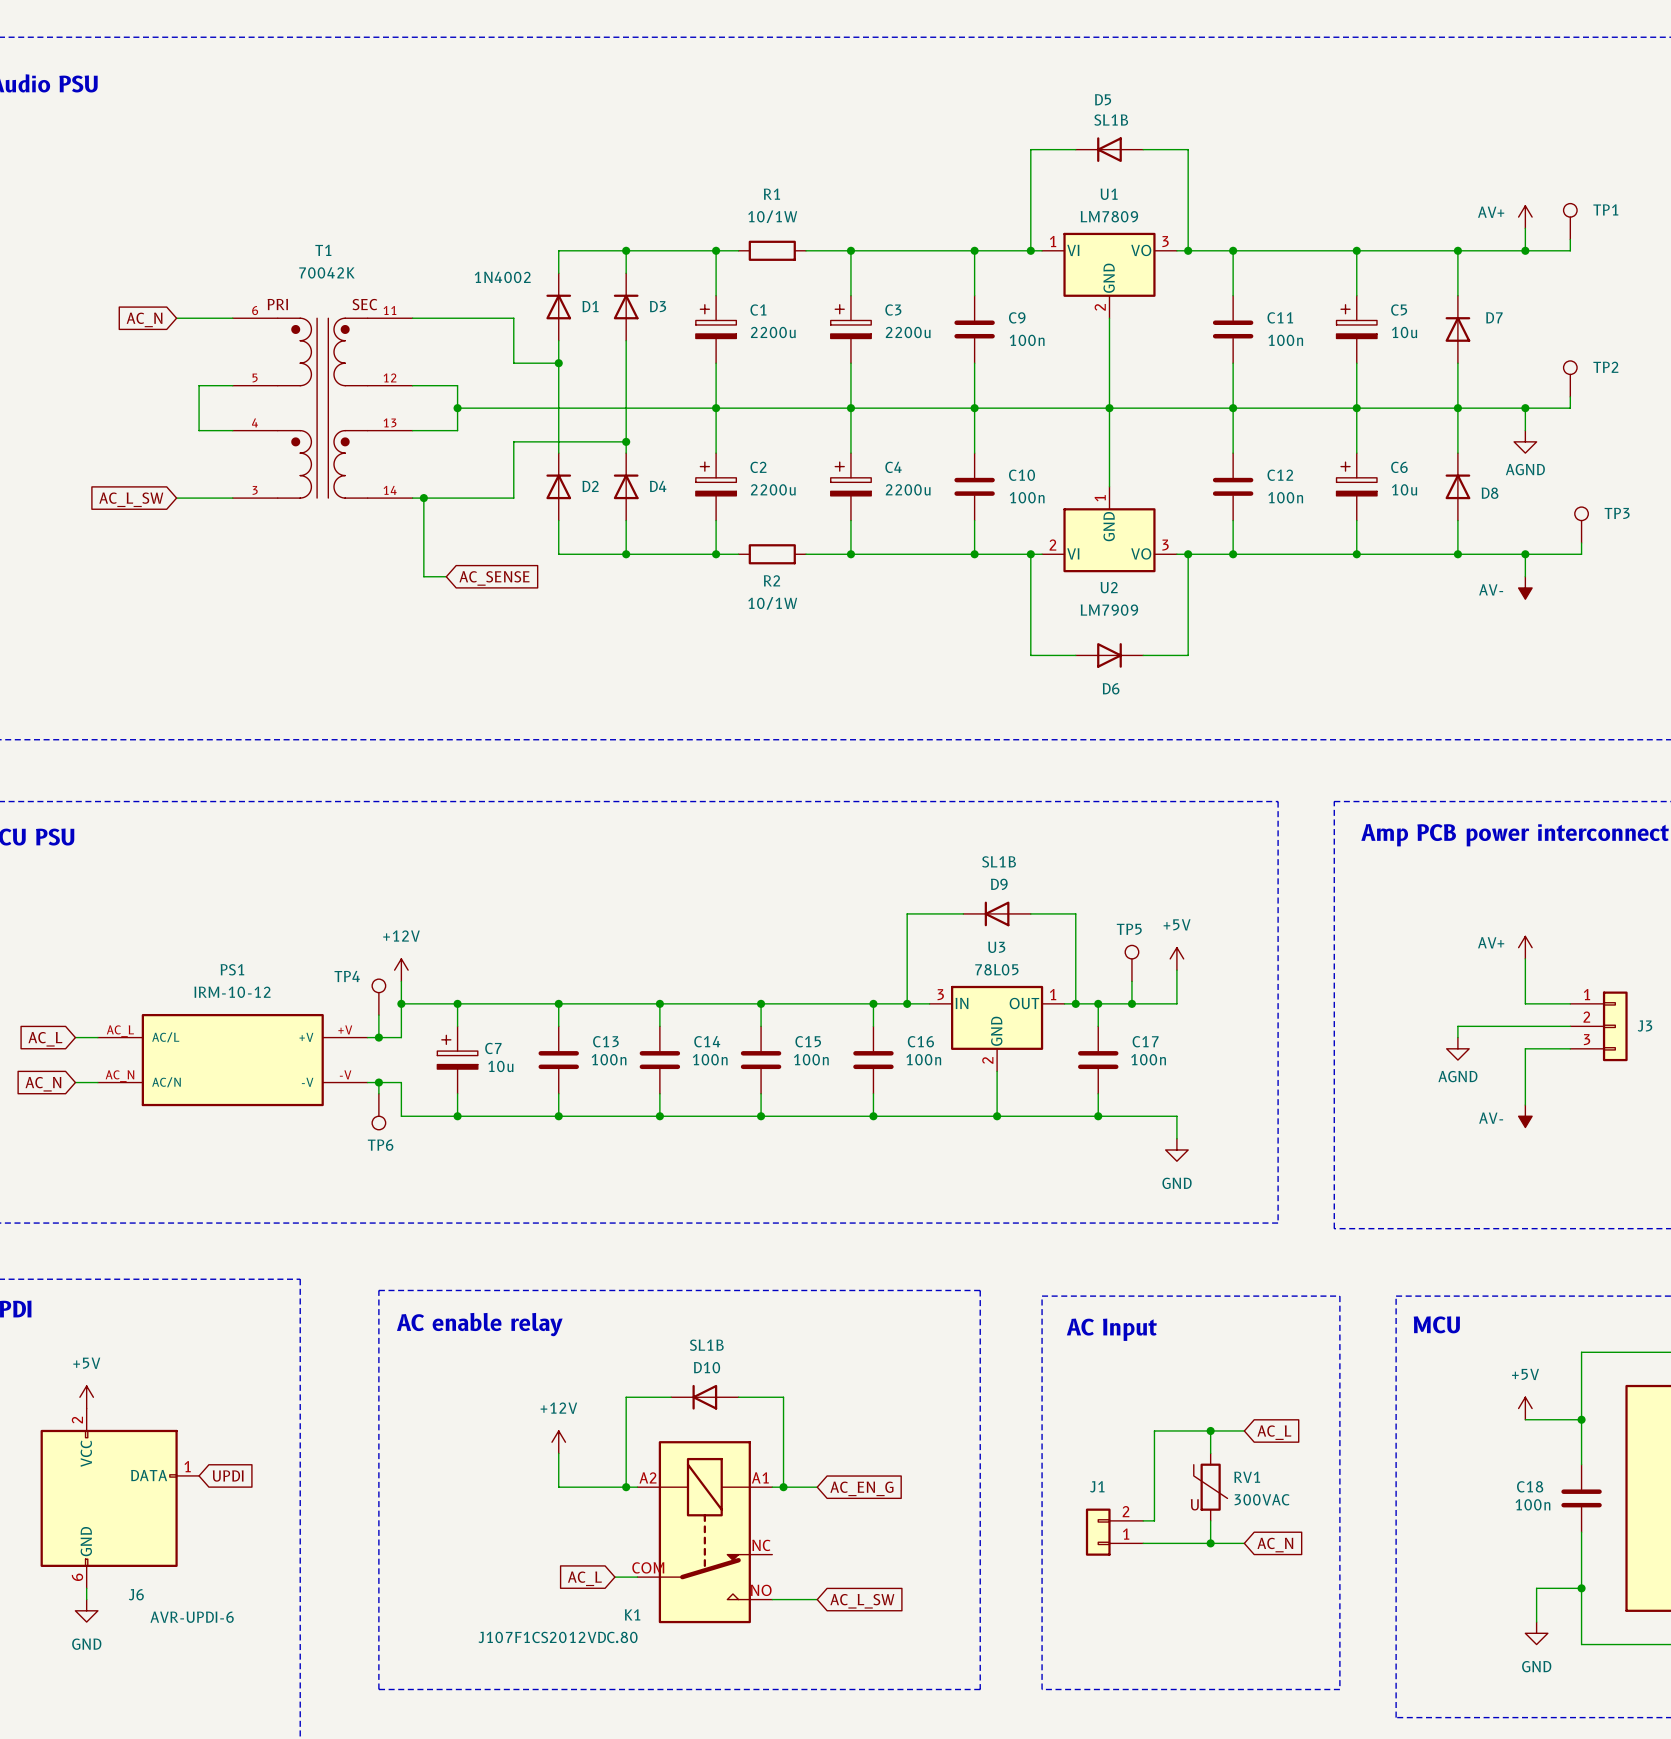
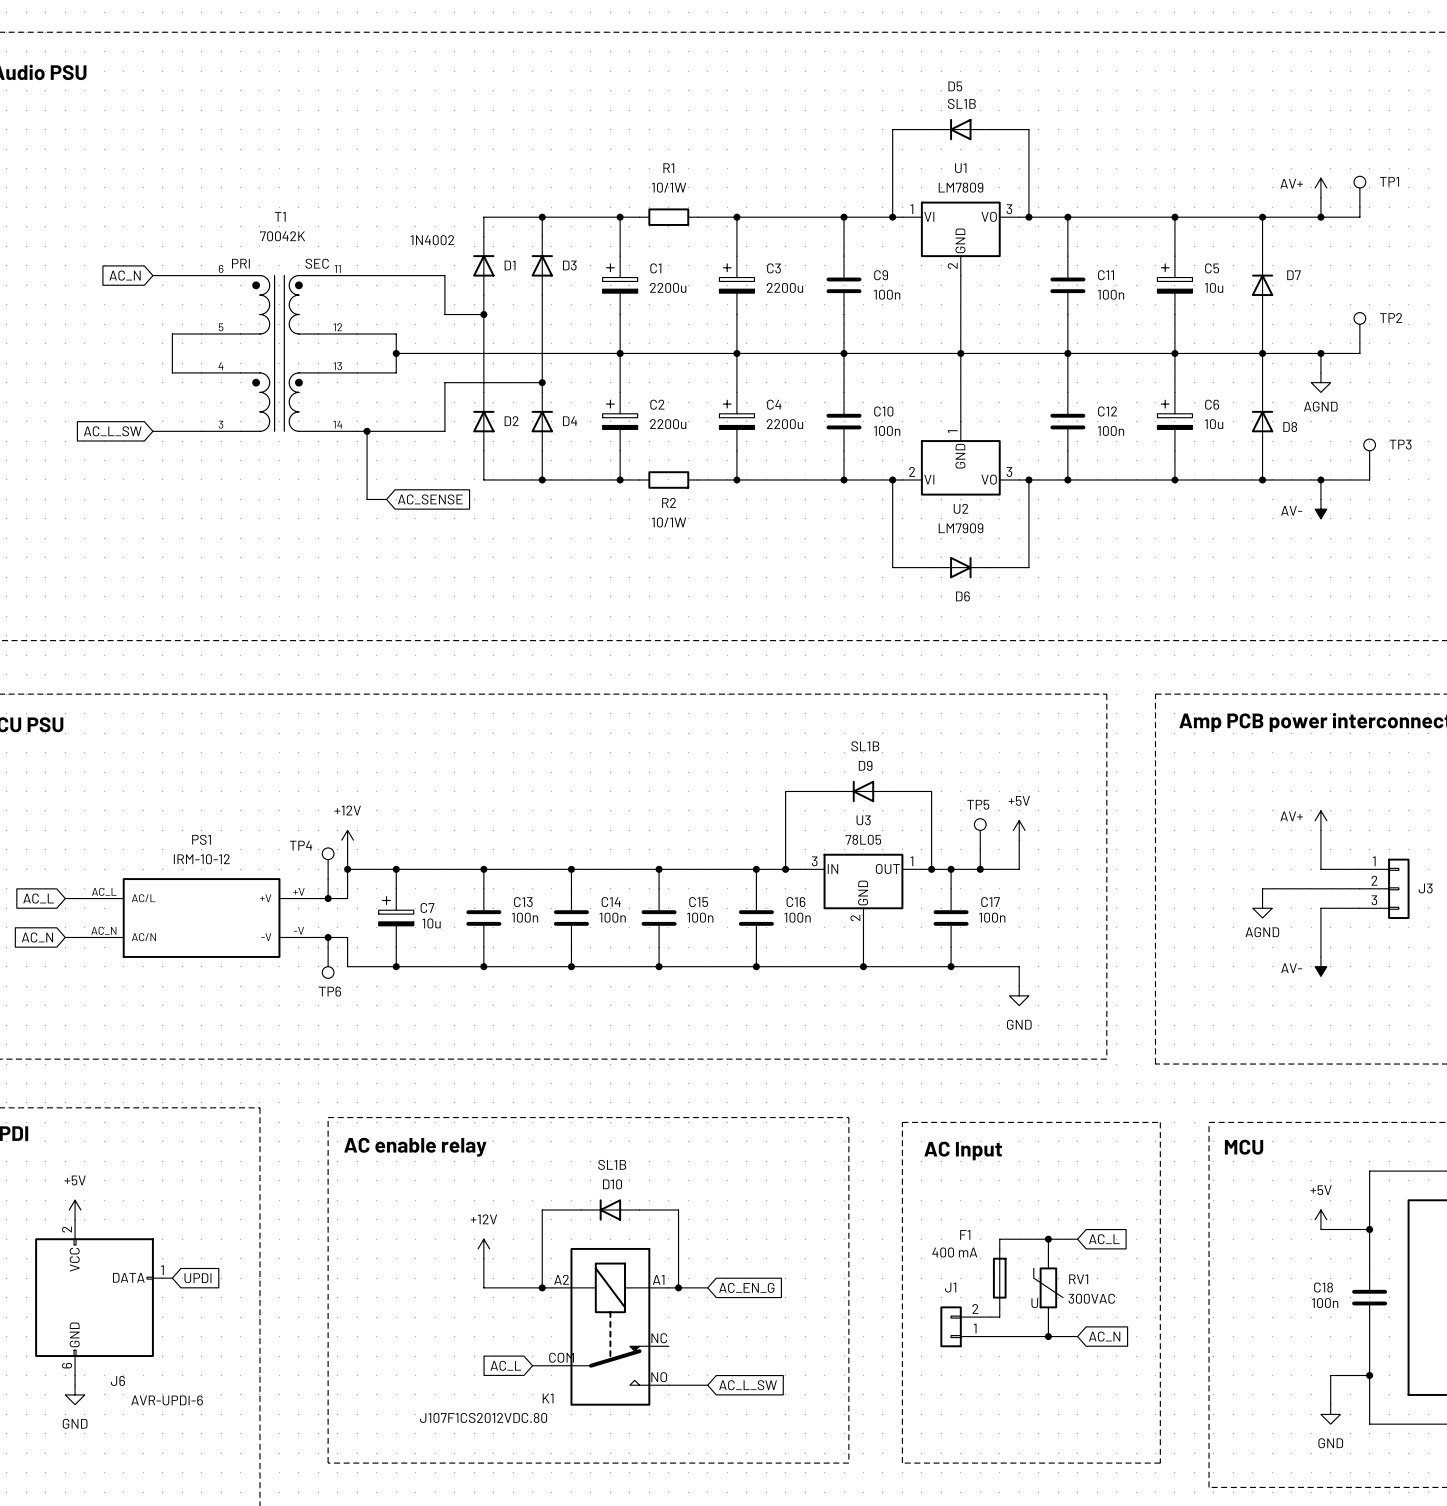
F1: none -> 400 mA (999, 1278)

